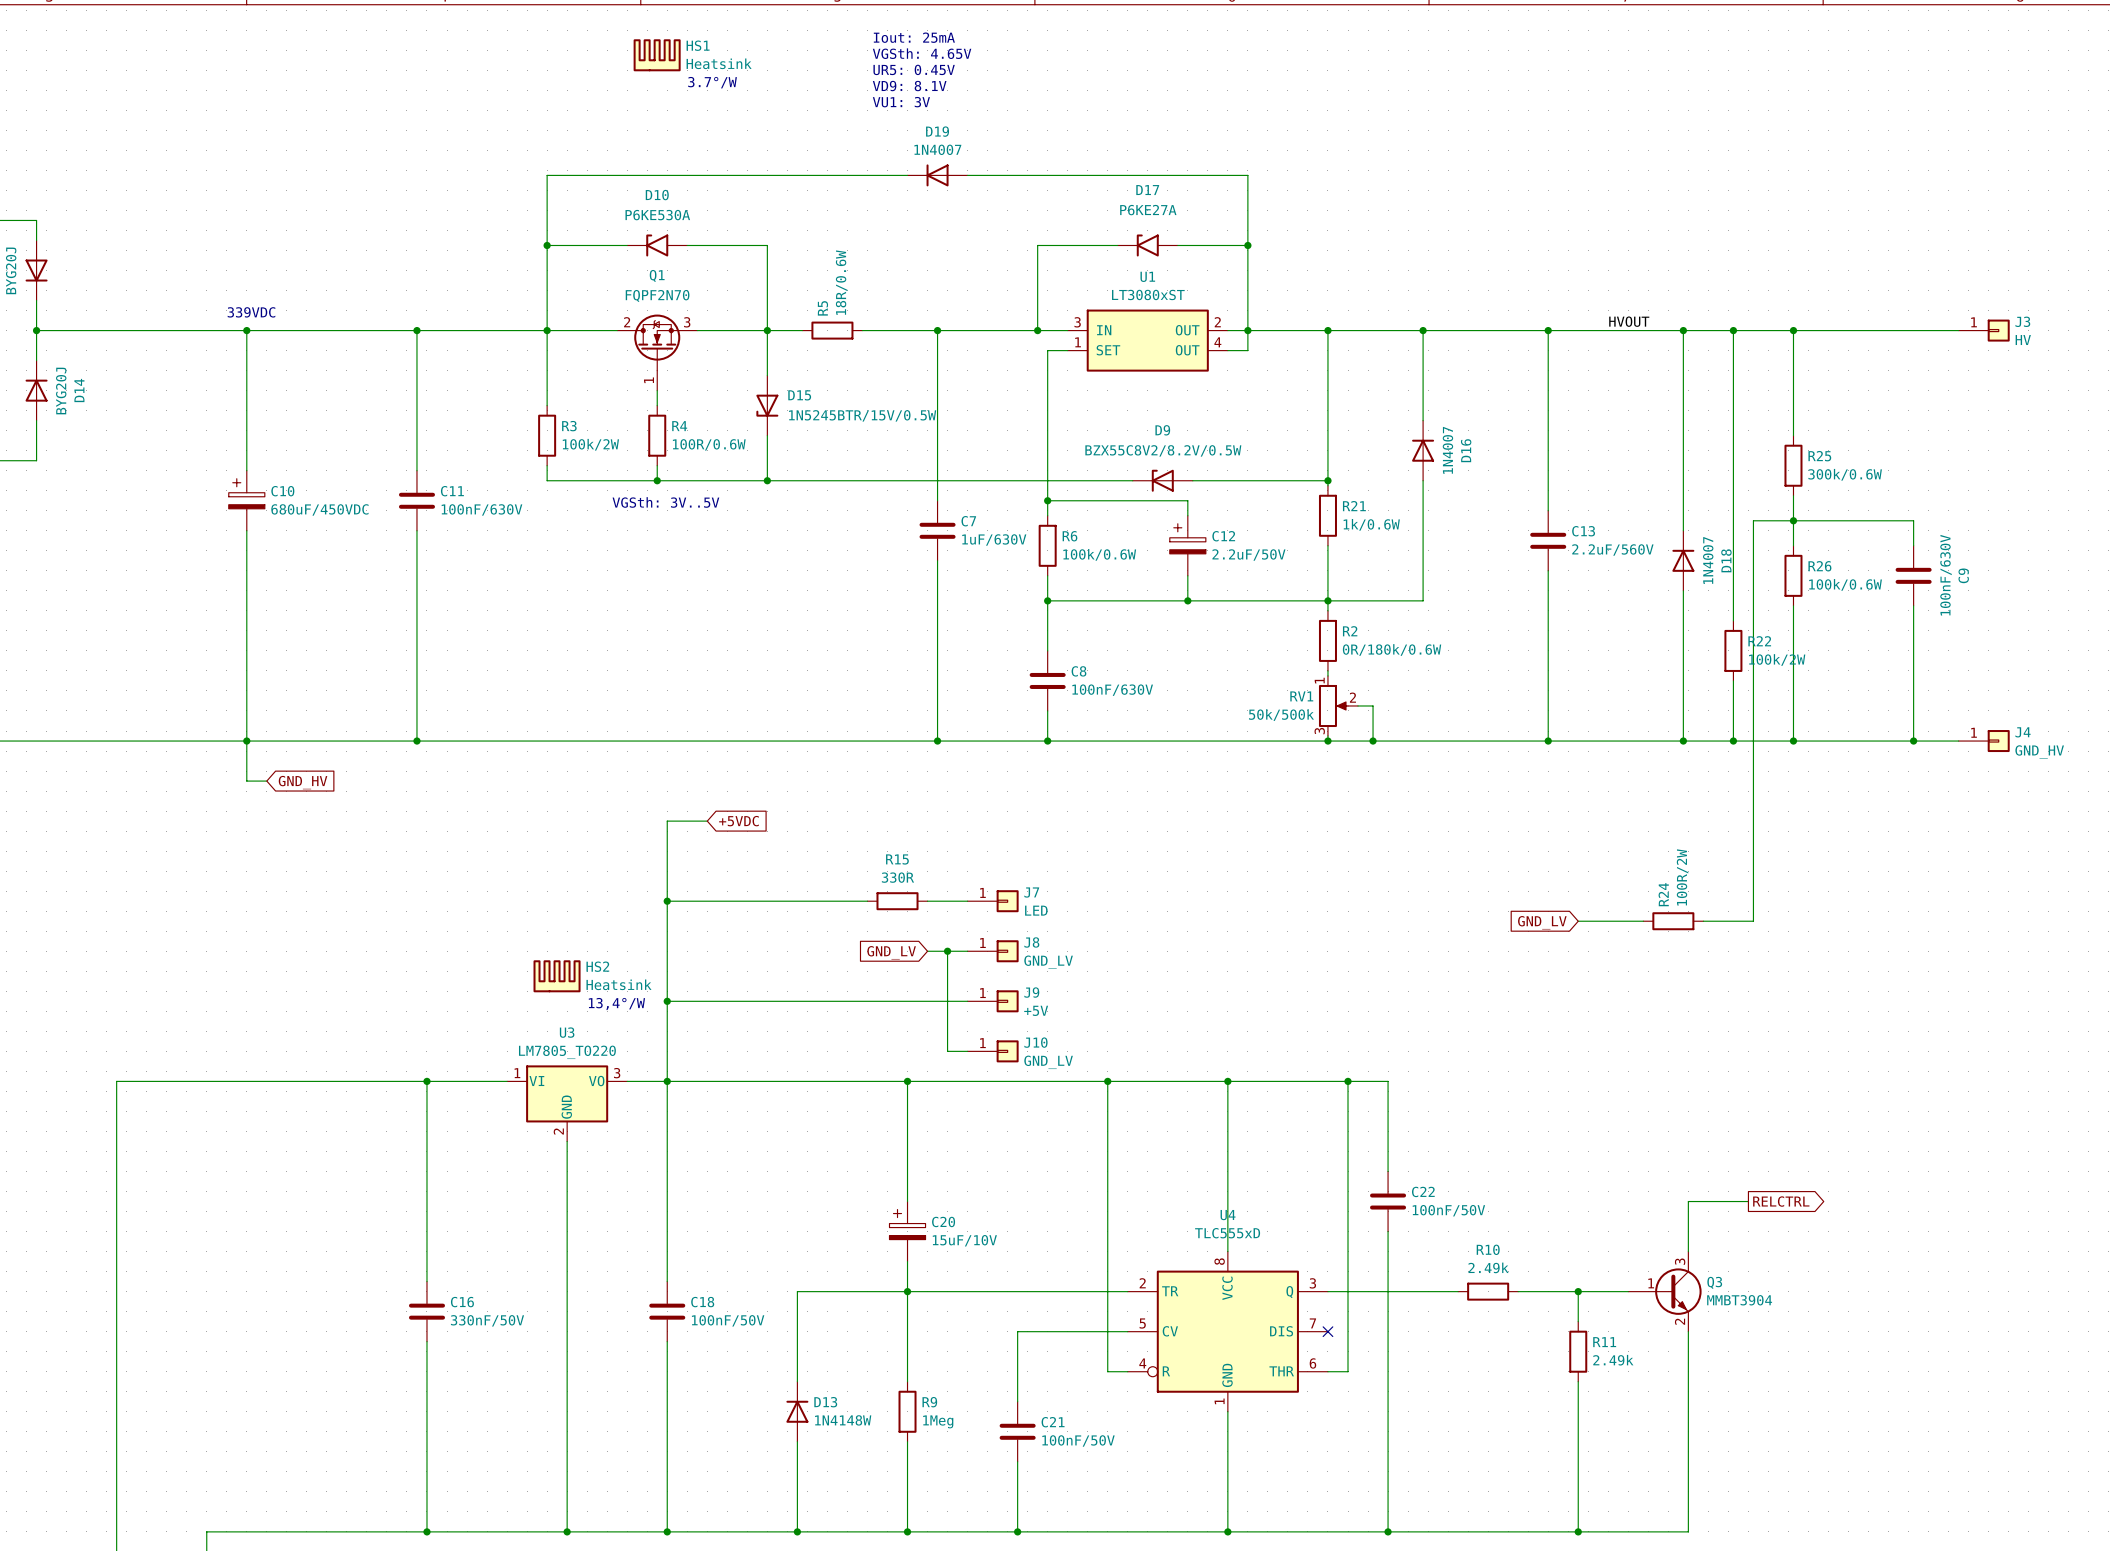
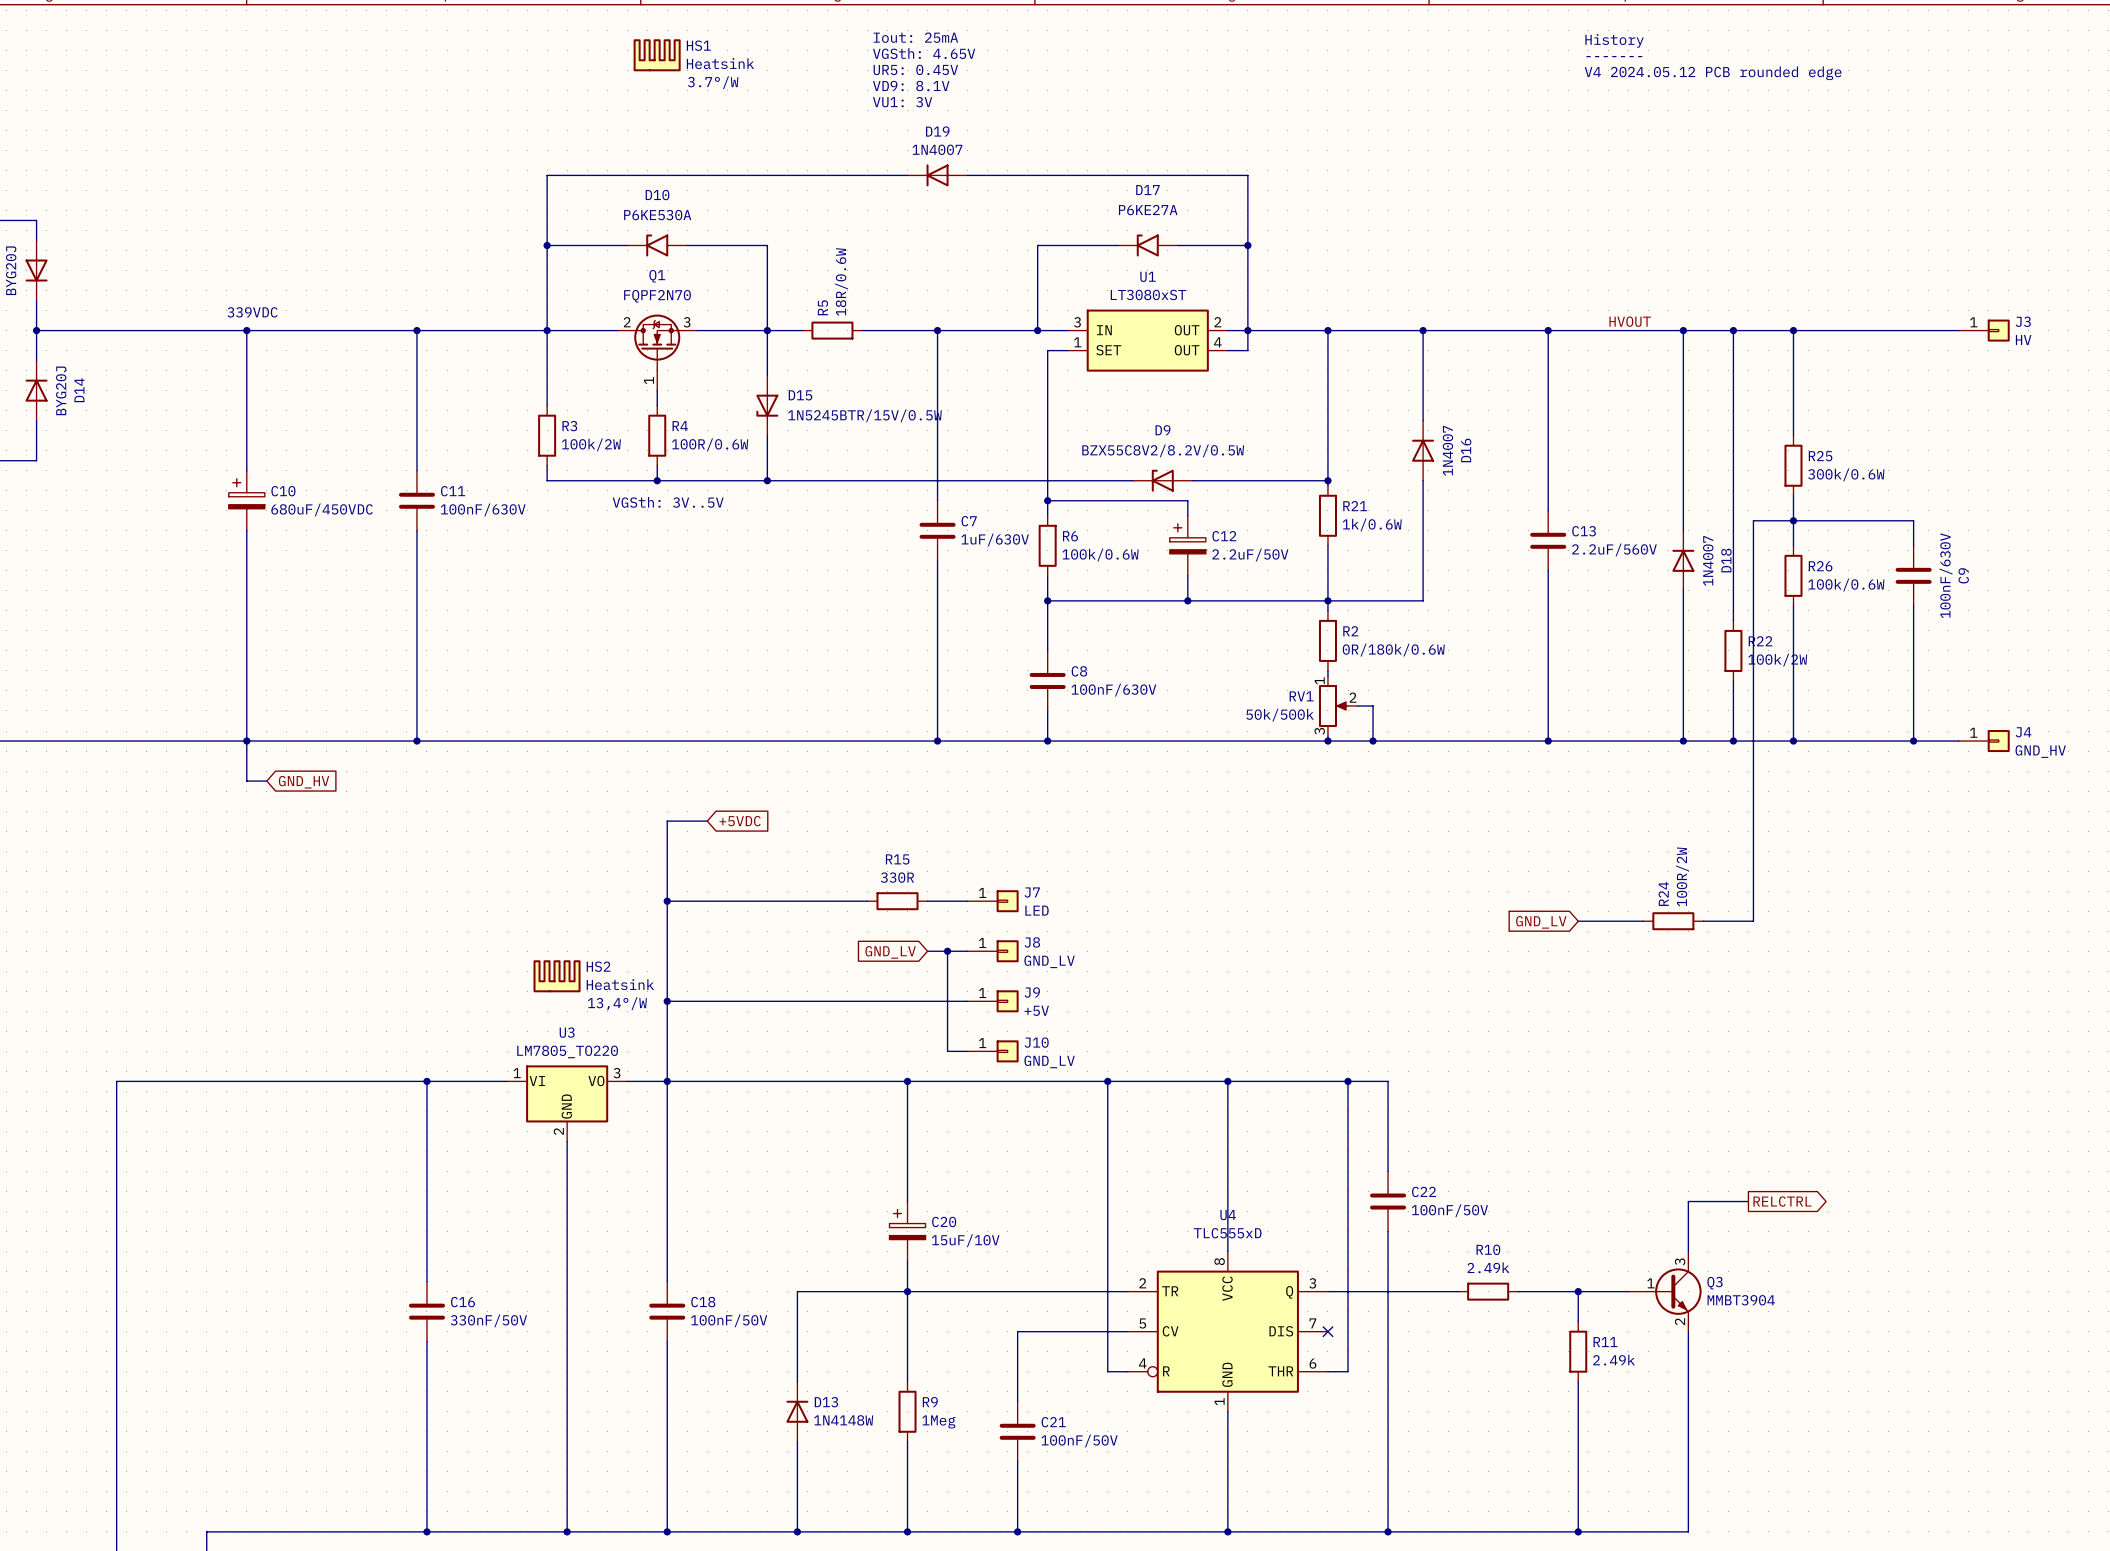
text: none -> History (1614, 40)
text: none -> ------- (1614, 56)
text: none -> V4 2024.05.12 PCB rounded edge (1713, 73)

